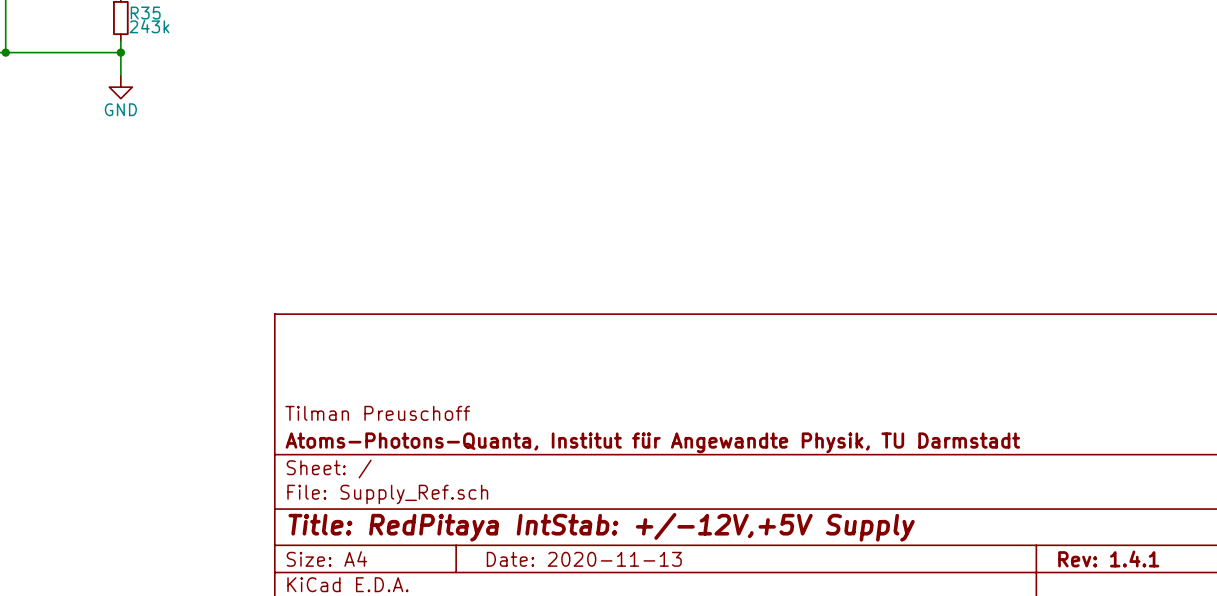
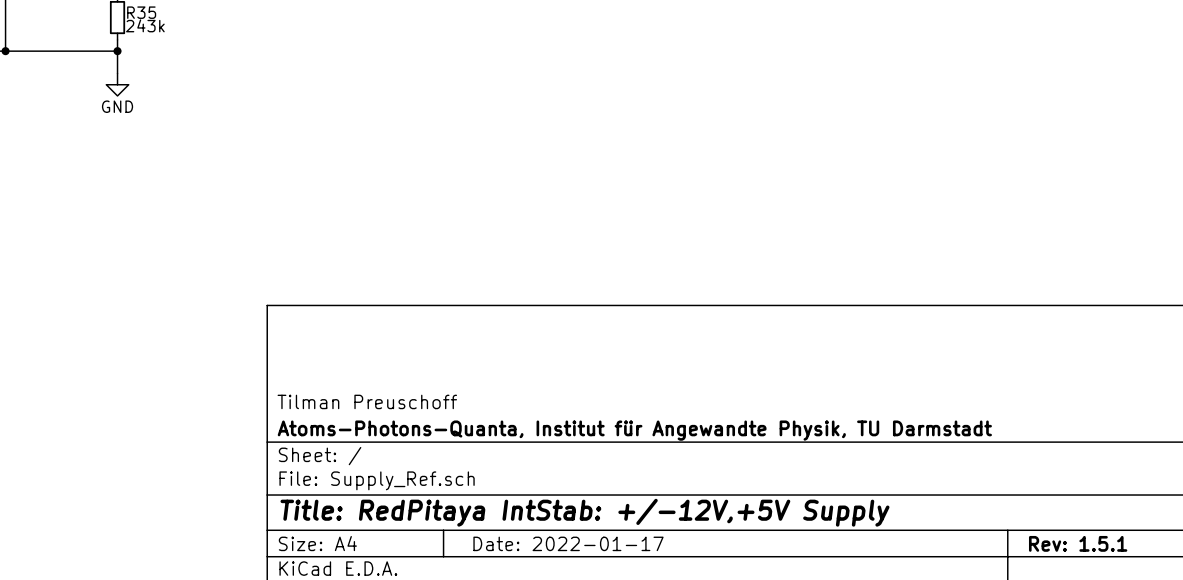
title block: Rev: 1.4.1 (1108, 558) -> Rev: 1.5.1 (1078, 543)
title block: Date: 2020-11-13 (584, 559) -> Date: 2022-01-17 (568, 543)

